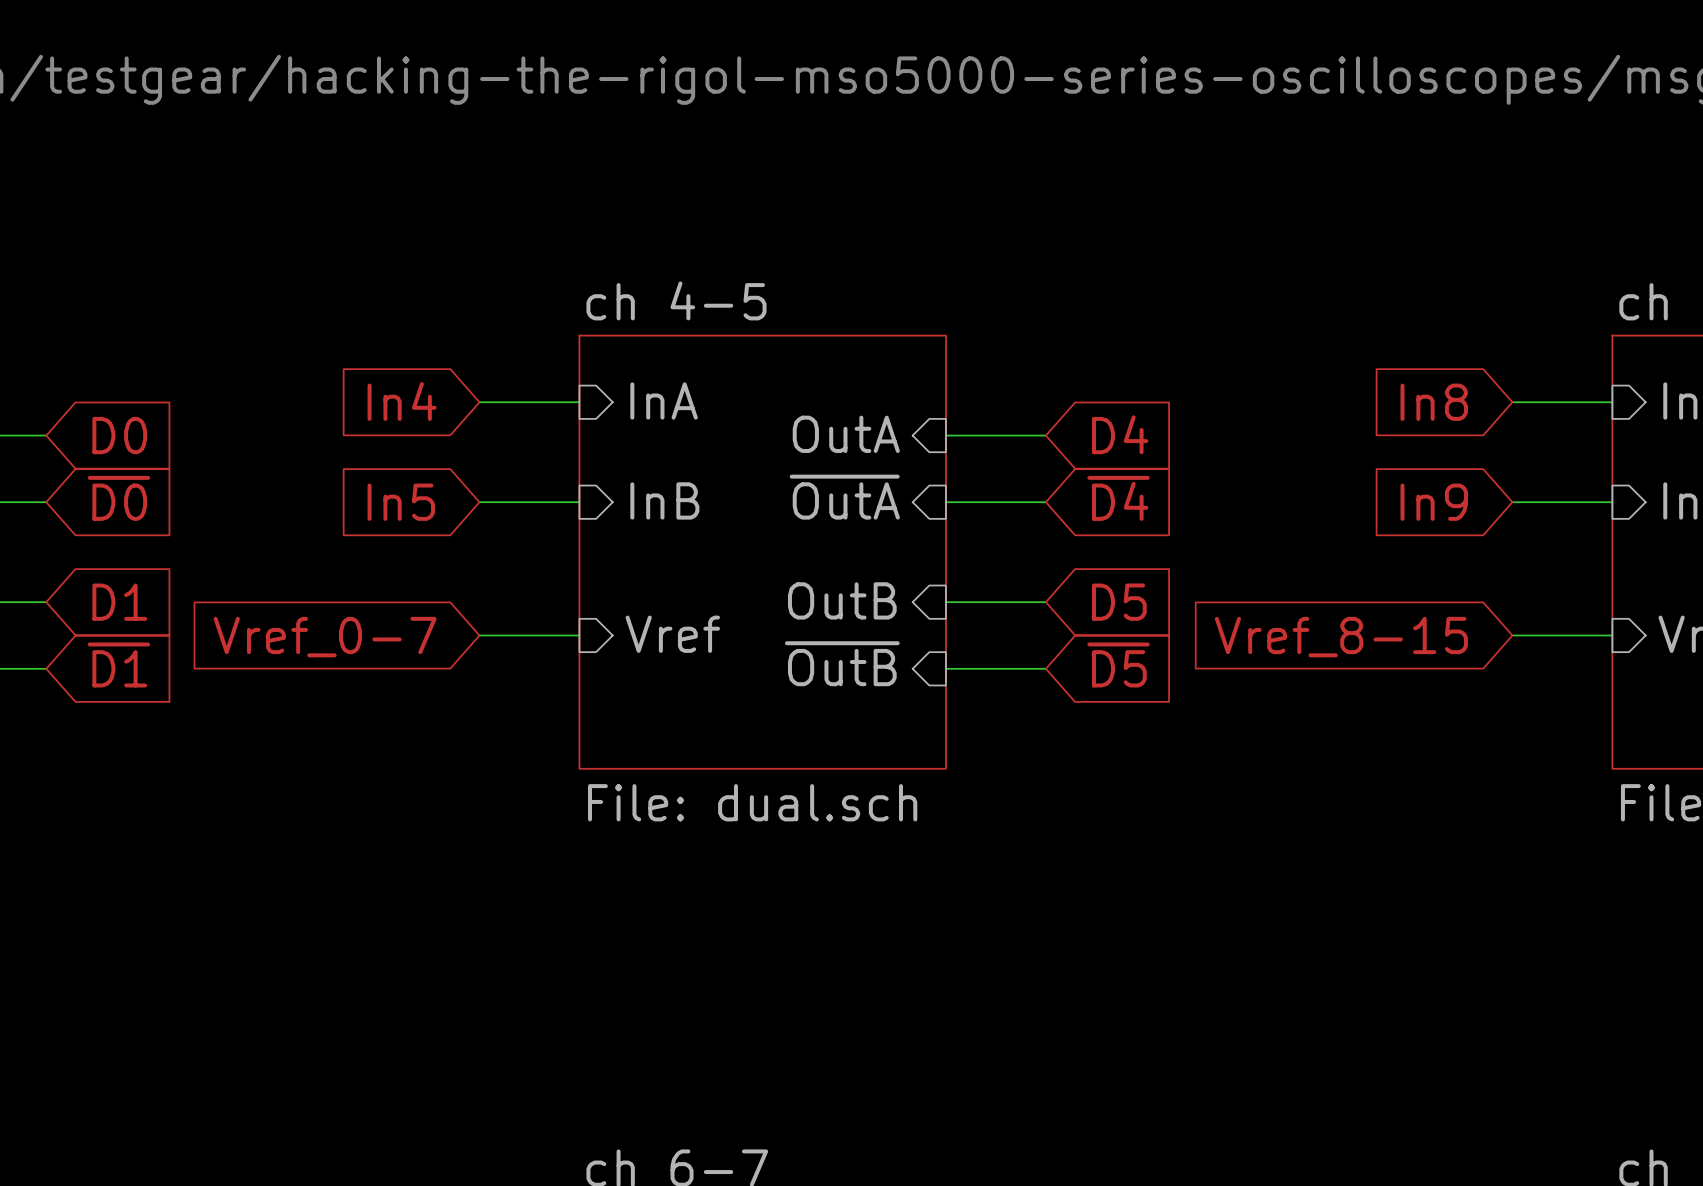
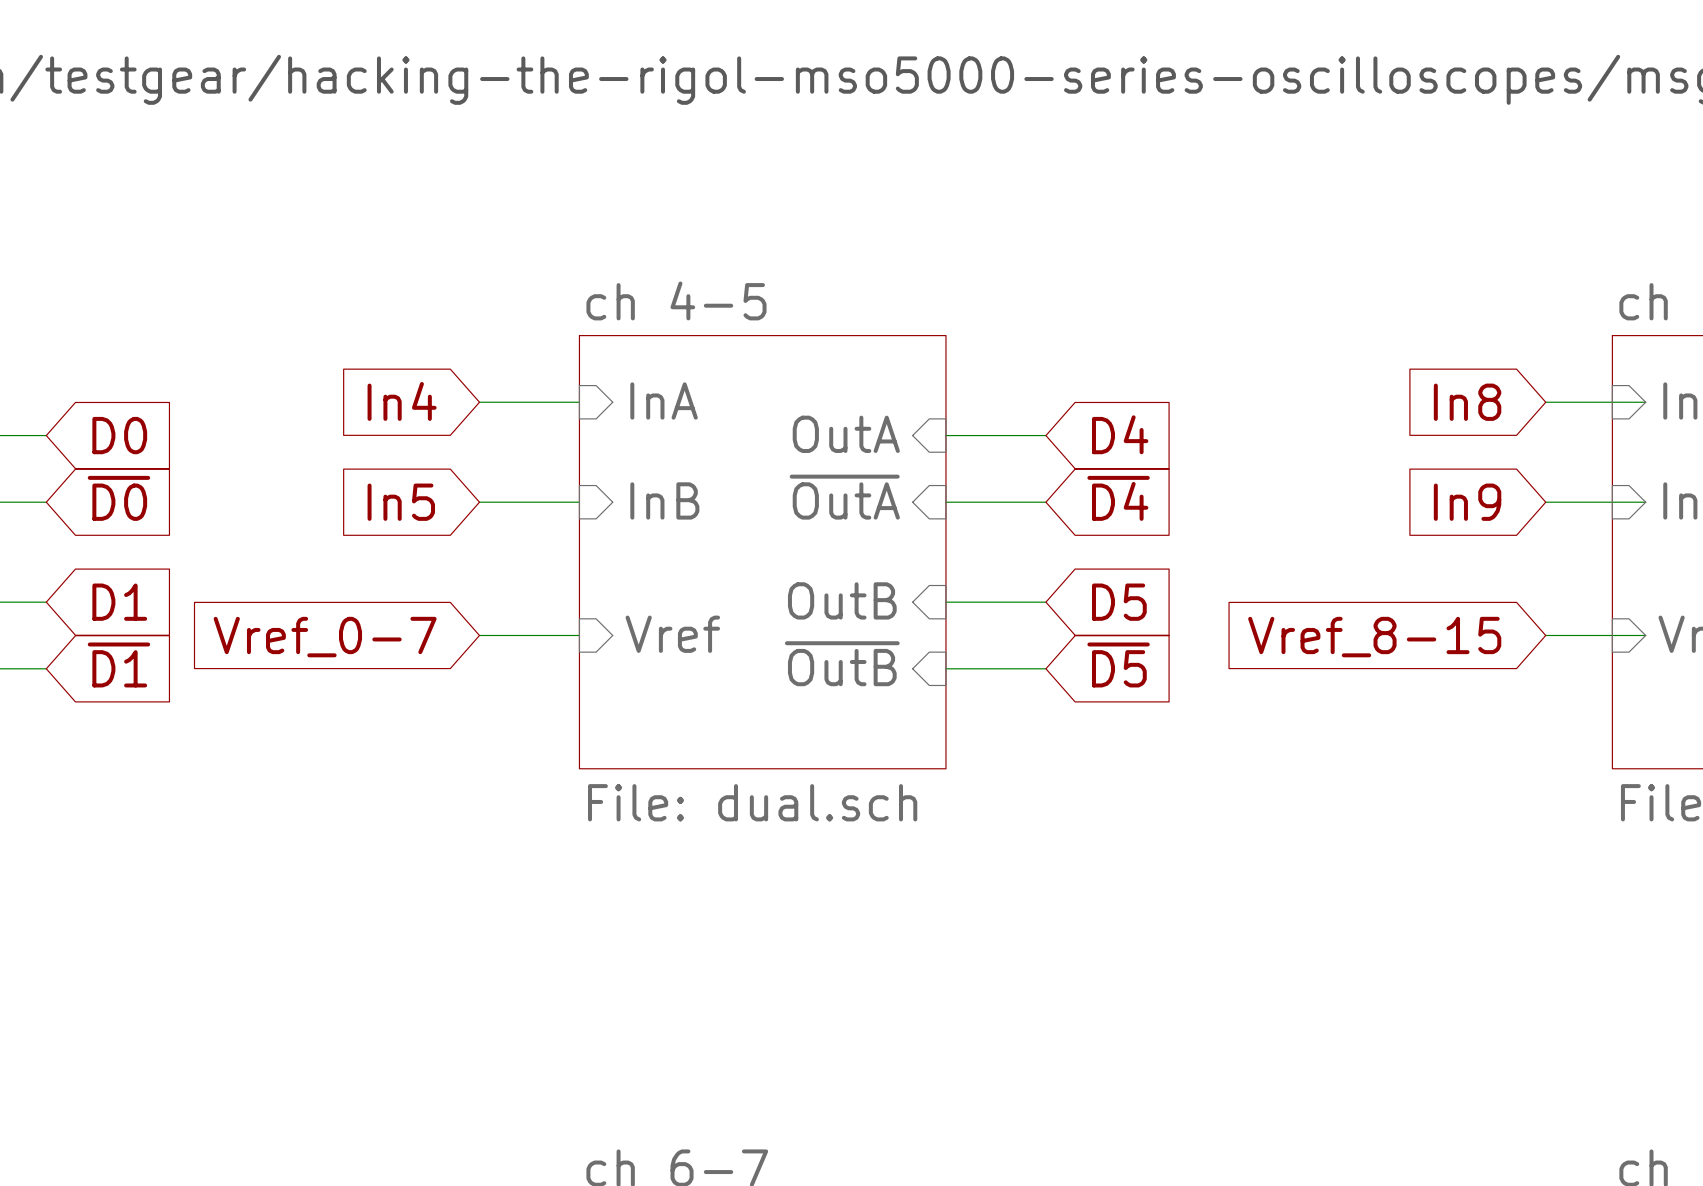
global label position: In8 (1434, 402) -> In8 (1467, 402)
wire: (1512, 402) (1545, 402) -> (1612, 402) (1645, 402)
global label position: In9 (1434, 502) -> In9 (1467, 502)
wire: (1512, 502) (1545, 502) -> (1612, 502) (1645, 502)
wire: (1512, 635) (1545, 635) -> (1612, 635) (1645, 635)
global label position: Vref_8-15 (1341, 637) -> Vref_8-15 (1374, 637)

